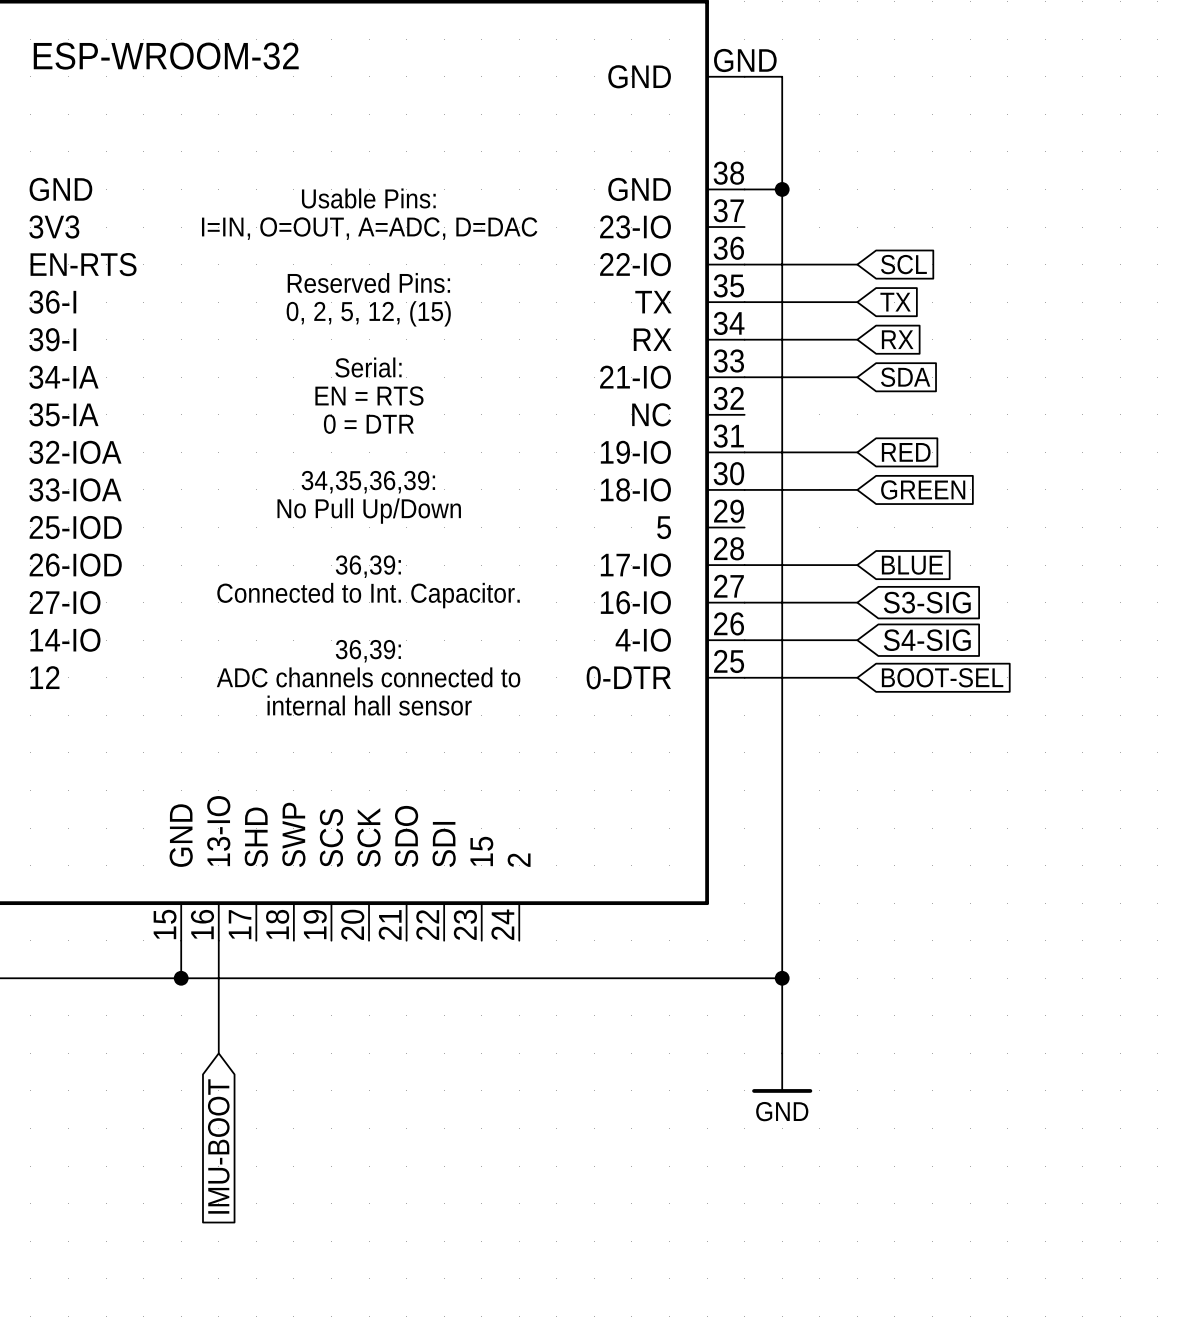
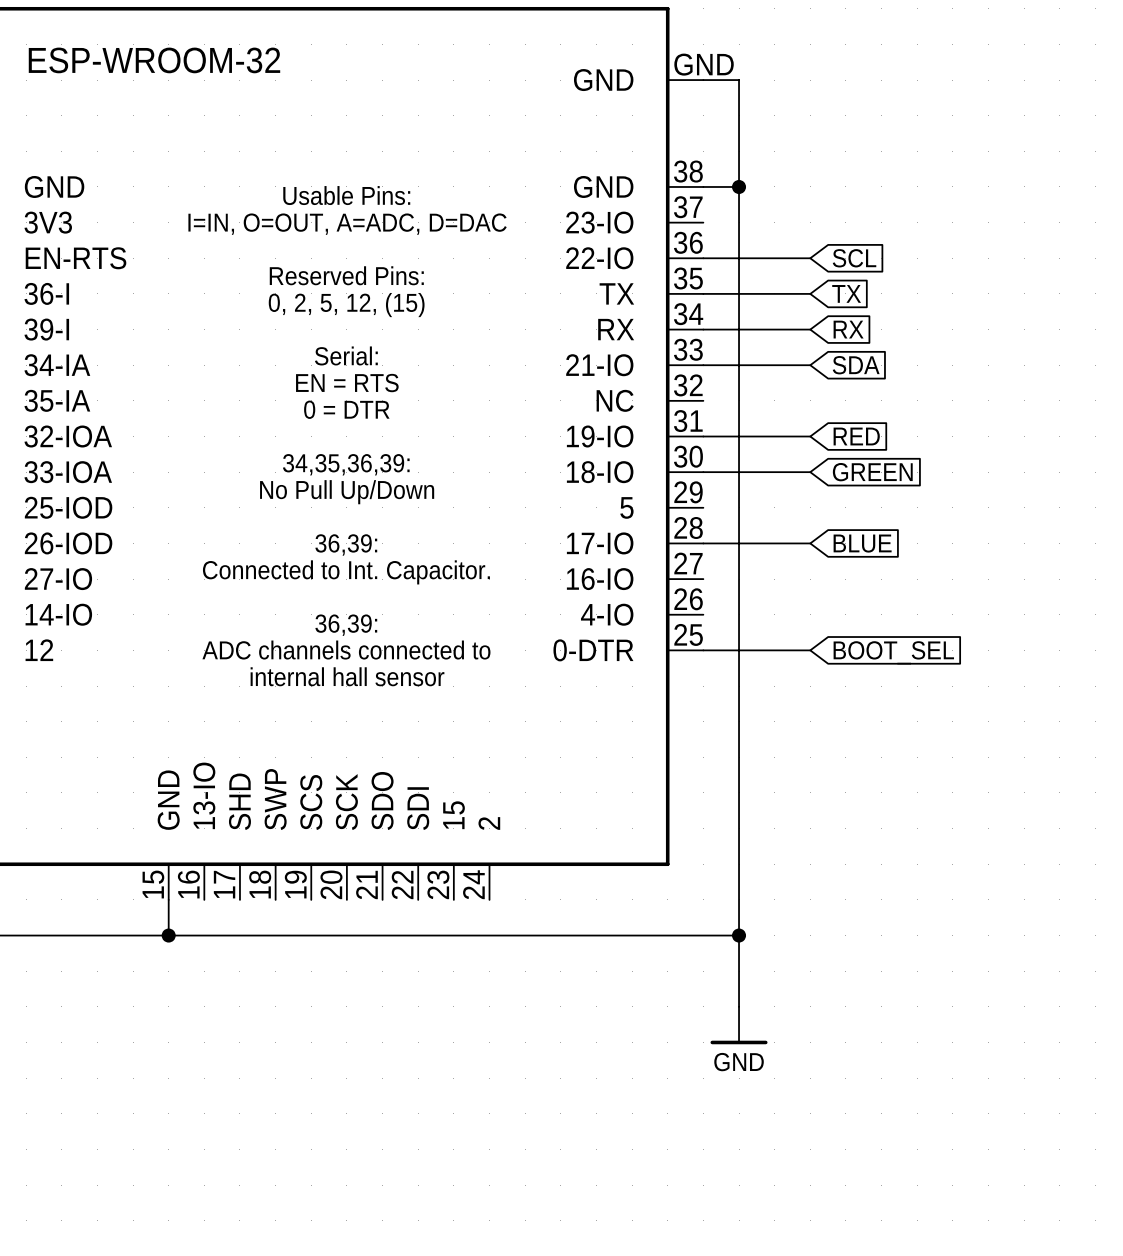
wire: (744, 602) (857, 602) -> none
global label: S3-SIG (927, 602) -> none
wire: (744, 640) (857, 640) -> none
global label: S4-SIG (927, 640) -> none
global label: BOOT-SEL (942, 677) -> BOOT_SEL (893, 652)
wire: (218, 940) (218, 1053) -> none
global label: IMU-BOOT (218, 1146) -> none

